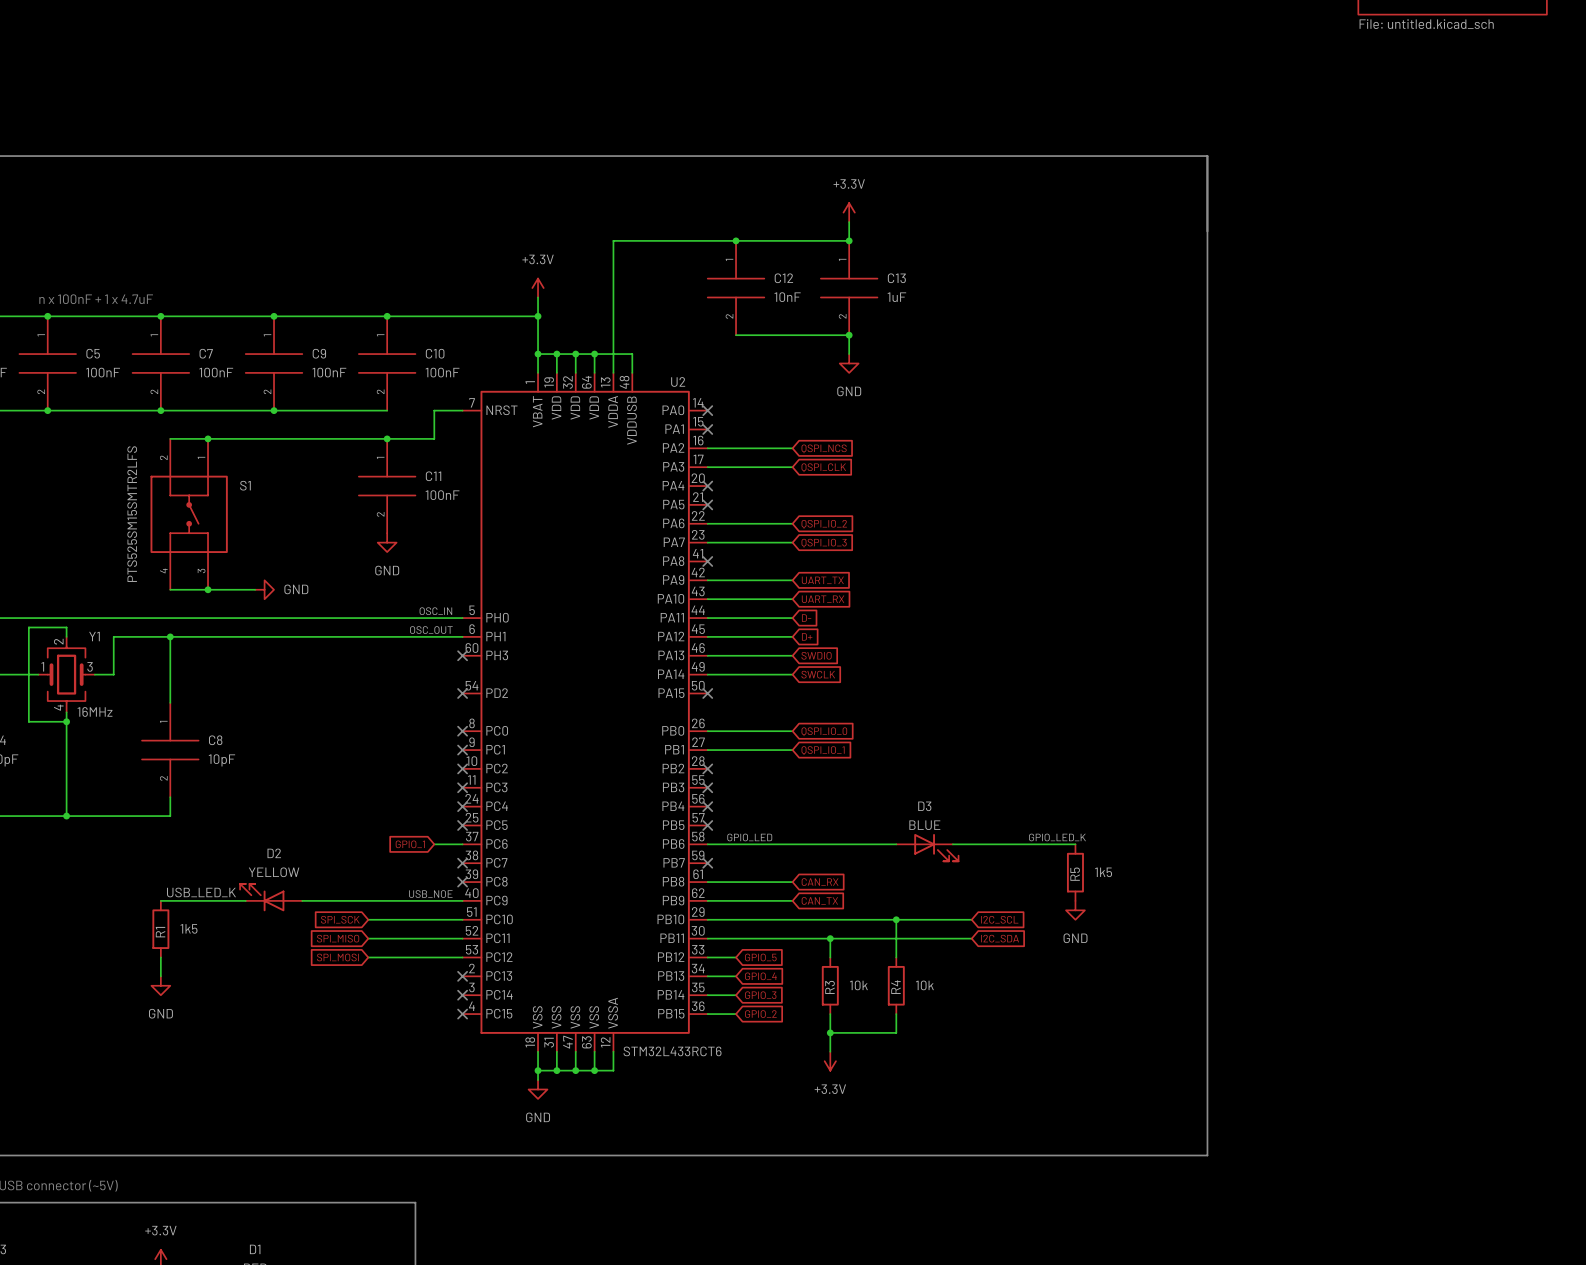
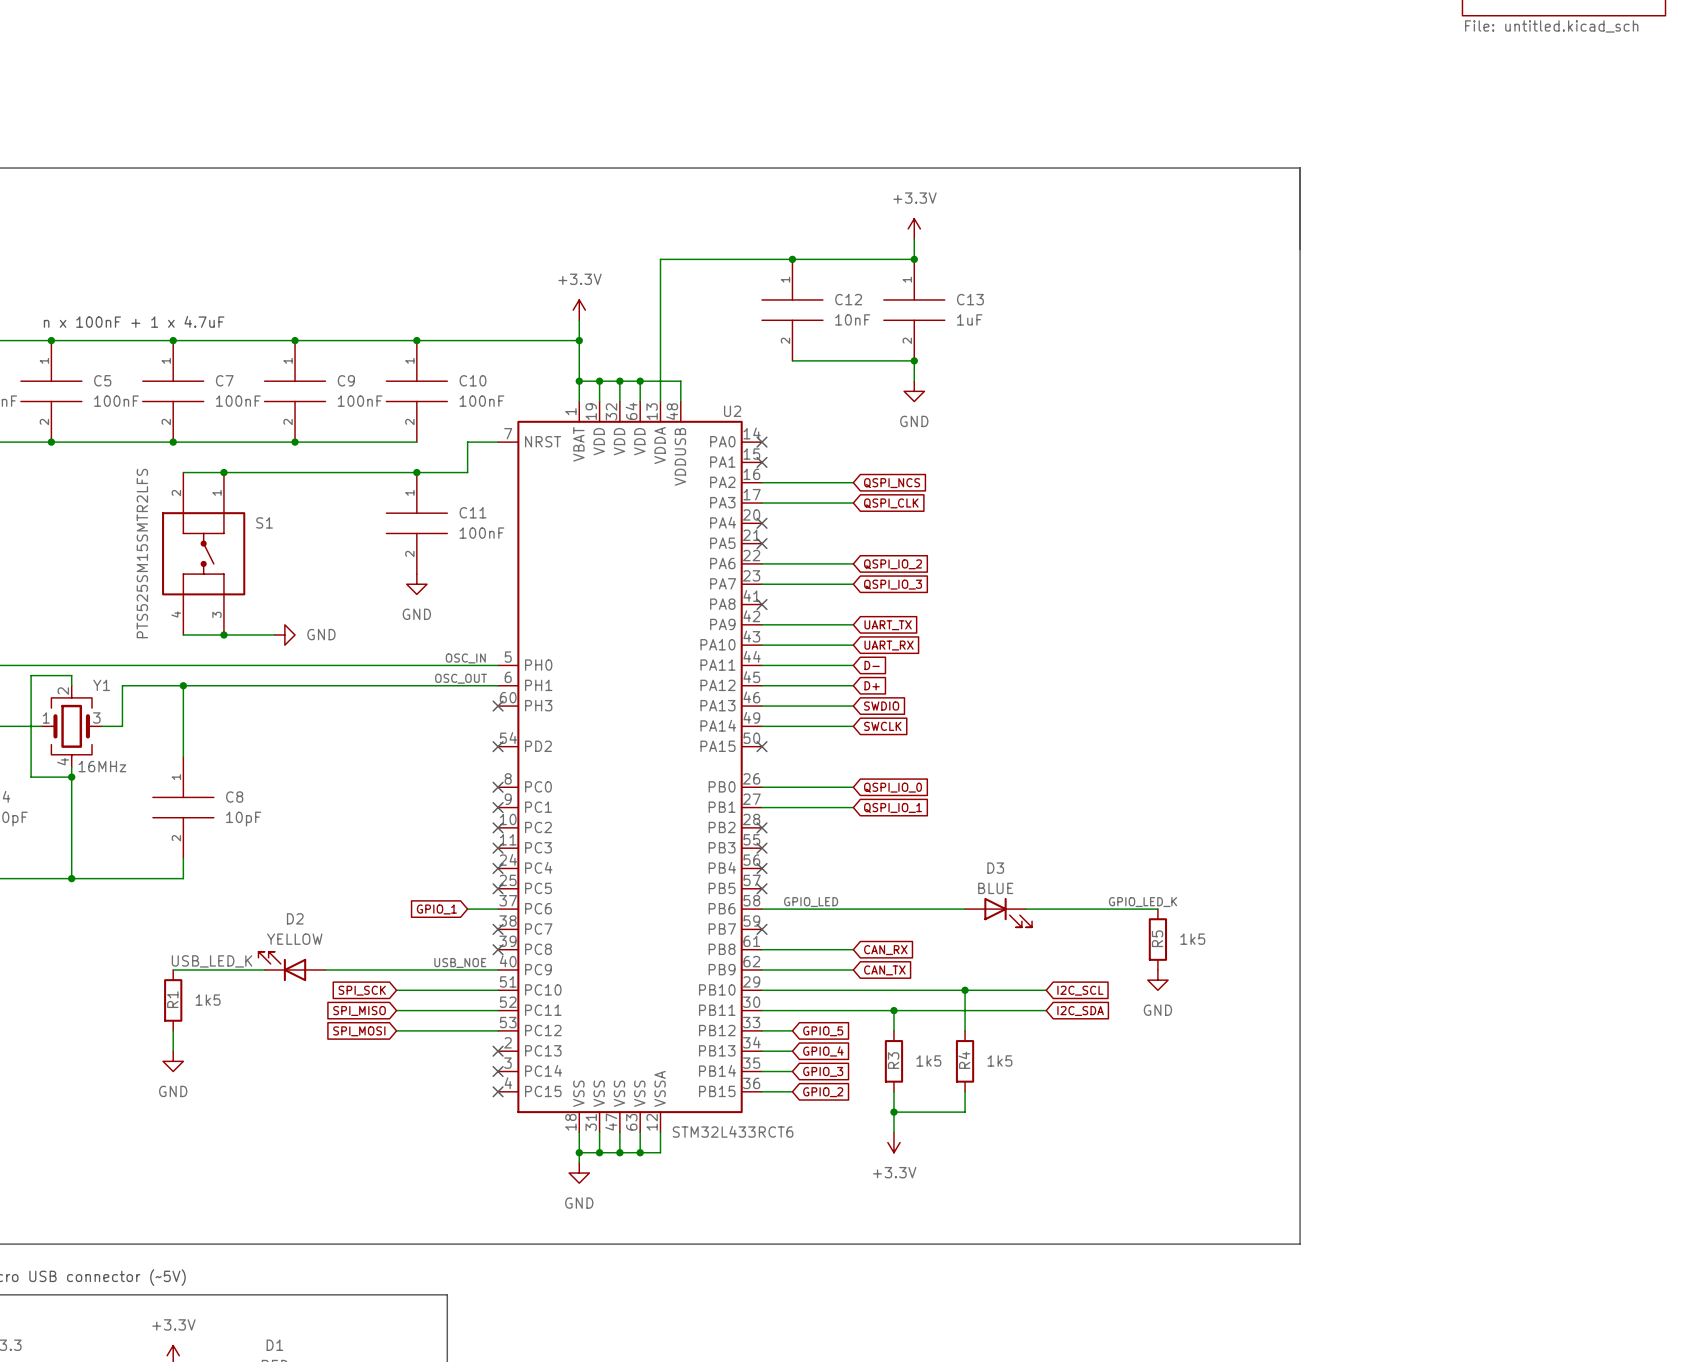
R3 value: 10k (858, 985) -> 1k5 (928, 1060)
R4 value: 10k (924, 985) -> 1k5 (999, 1060)

